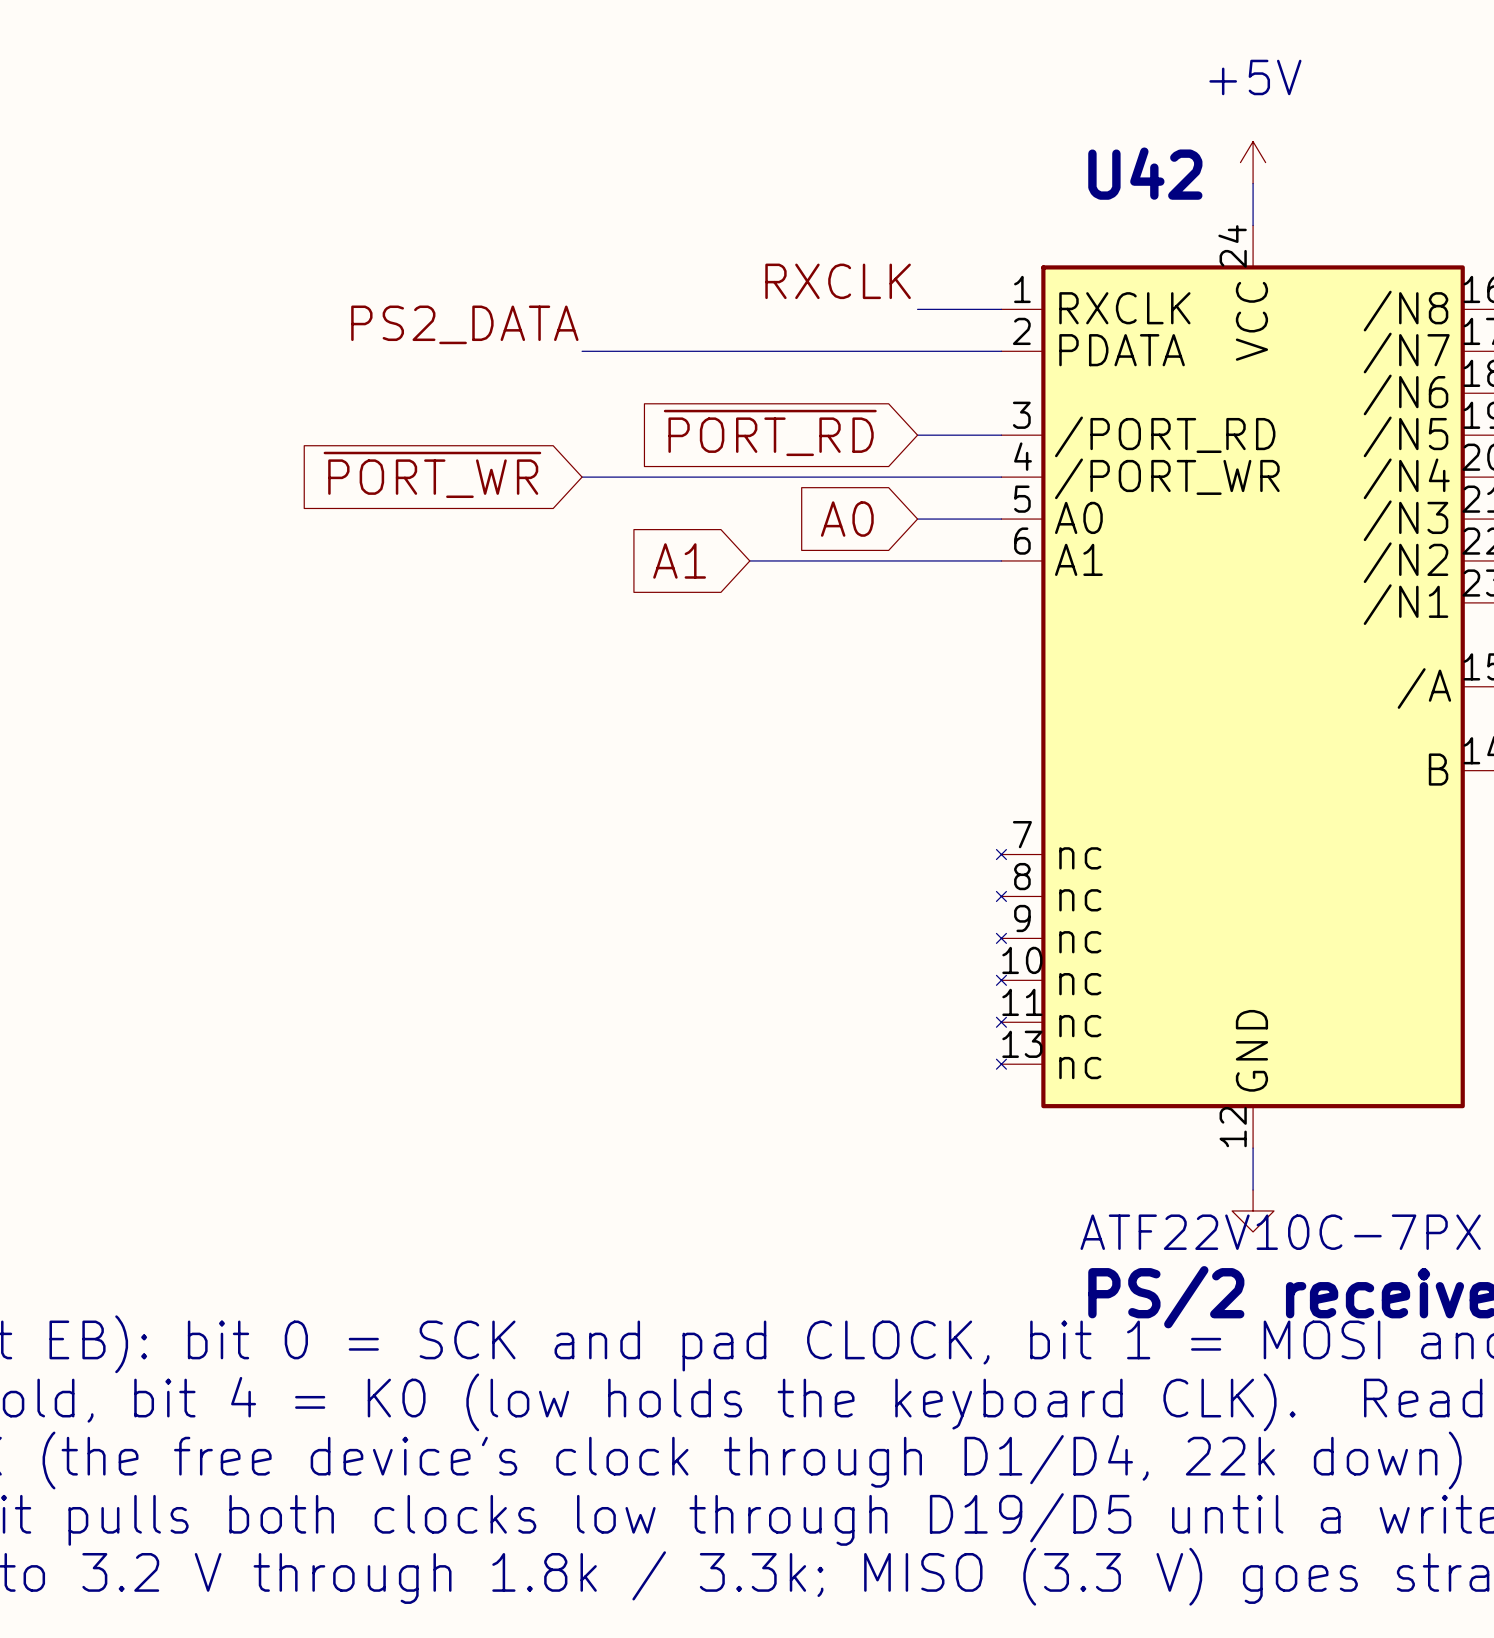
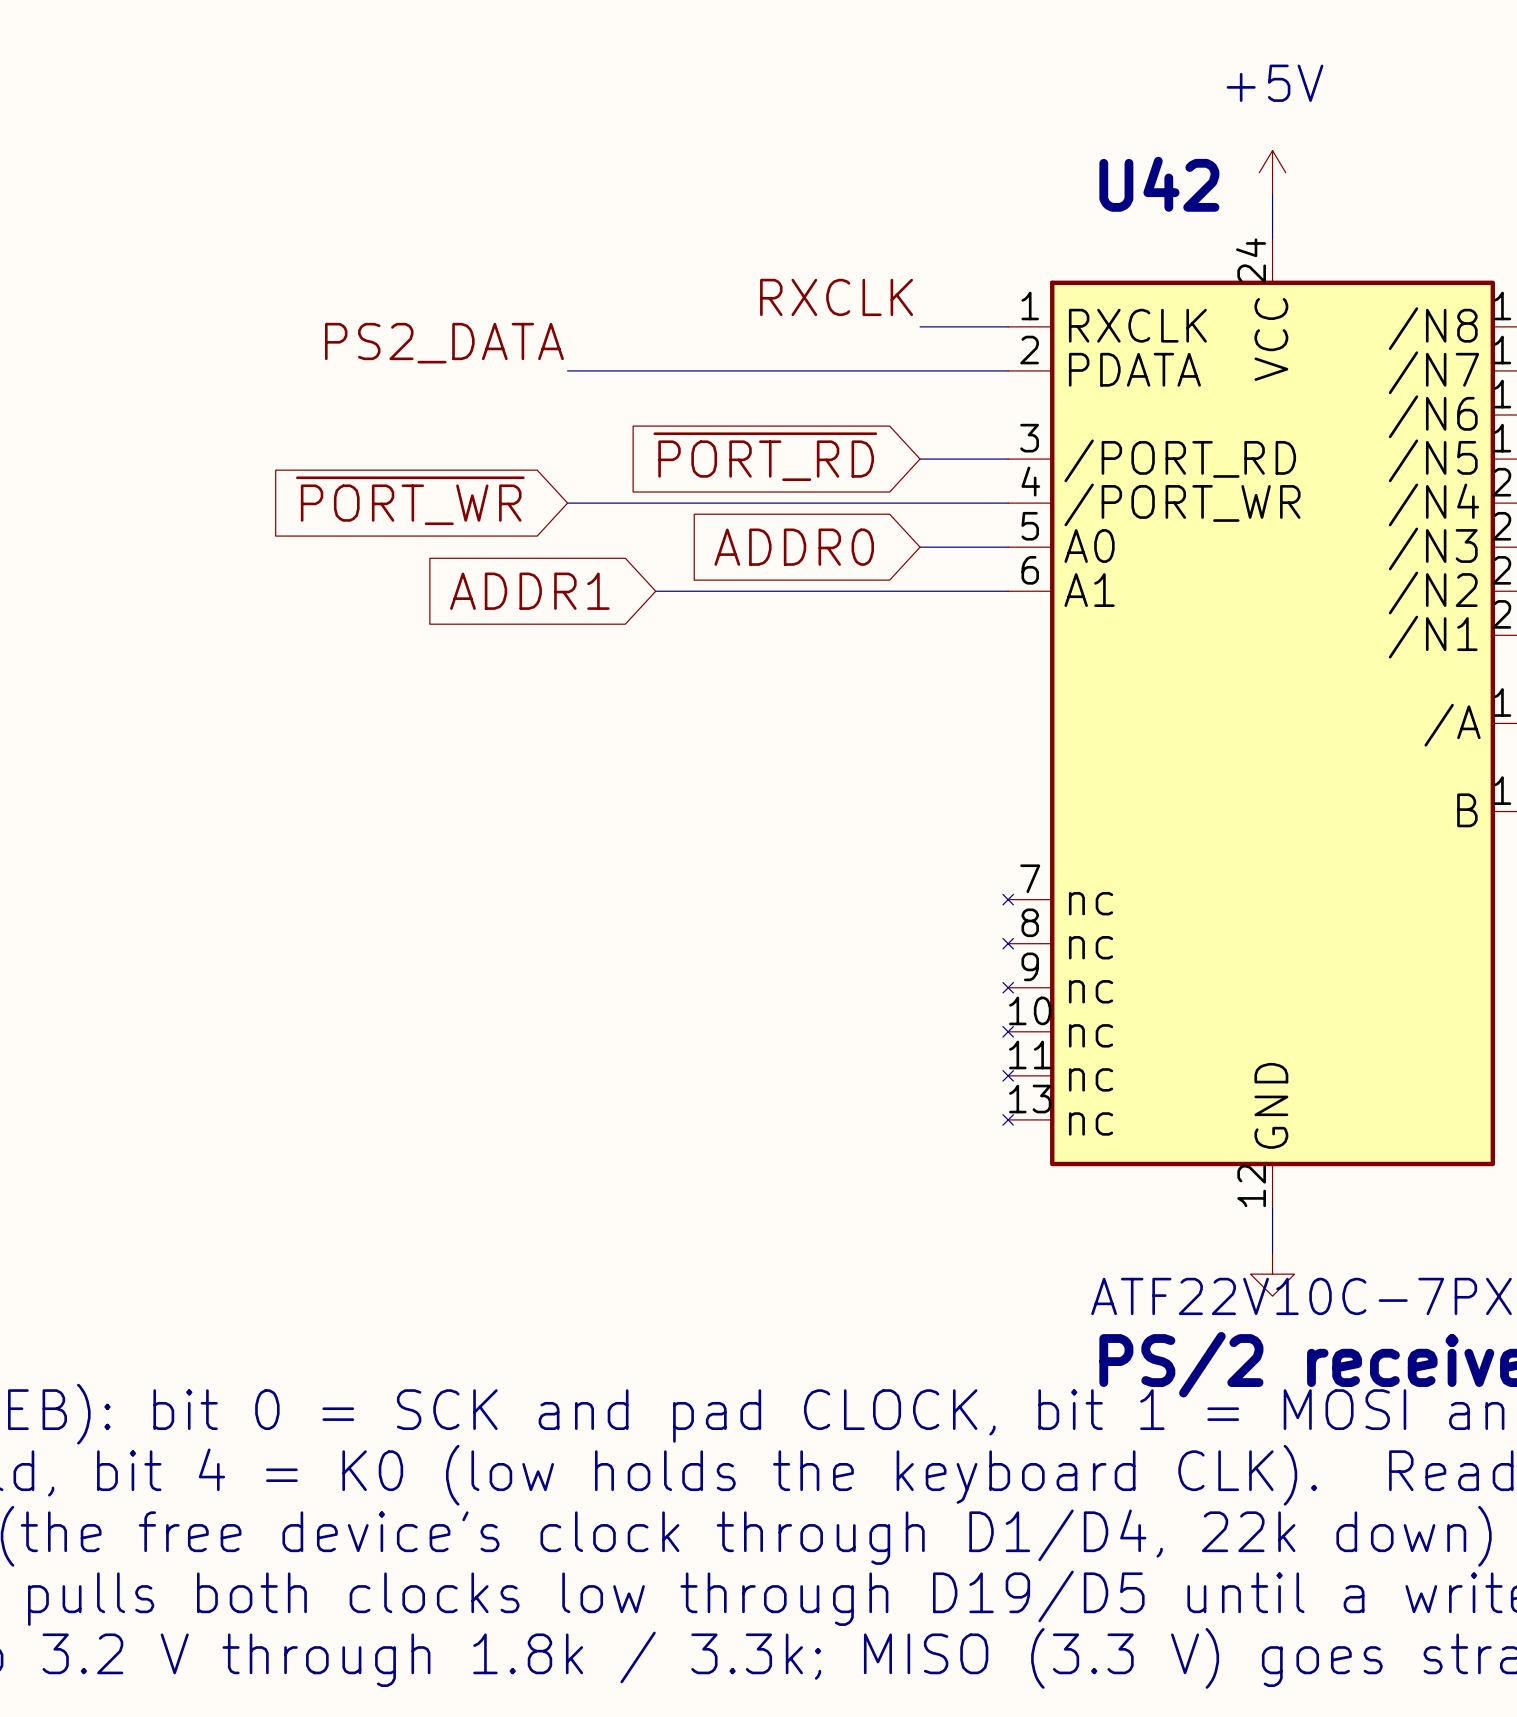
global label: A0 (847, 519) -> ADDR0 (794, 547)
global label: none -> ADDR1 (529, 591)
wire: none -> (655, 591) (743, 591)
global label: A1 (679, 560) -> none

